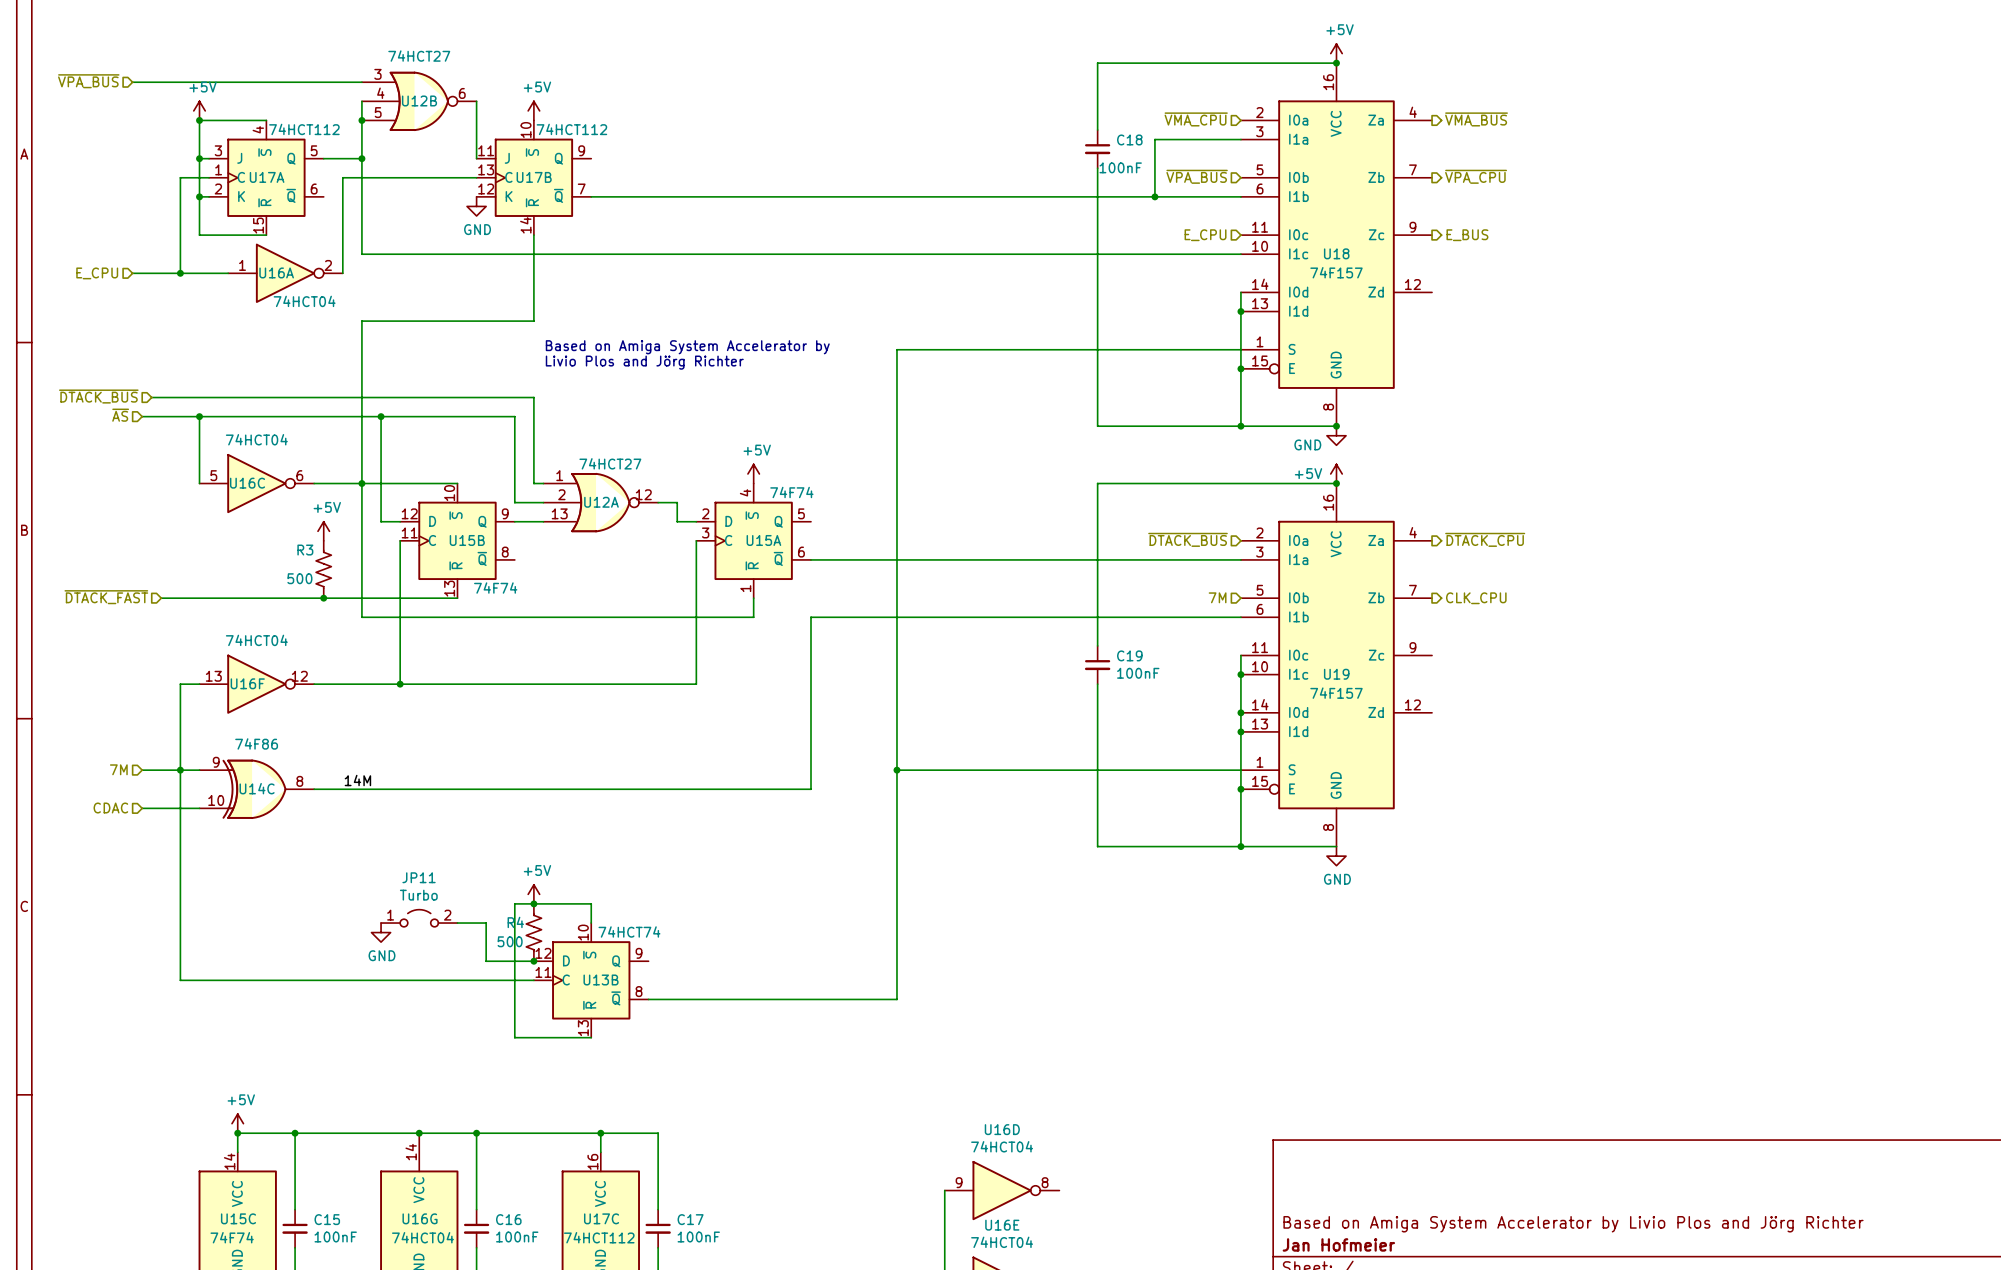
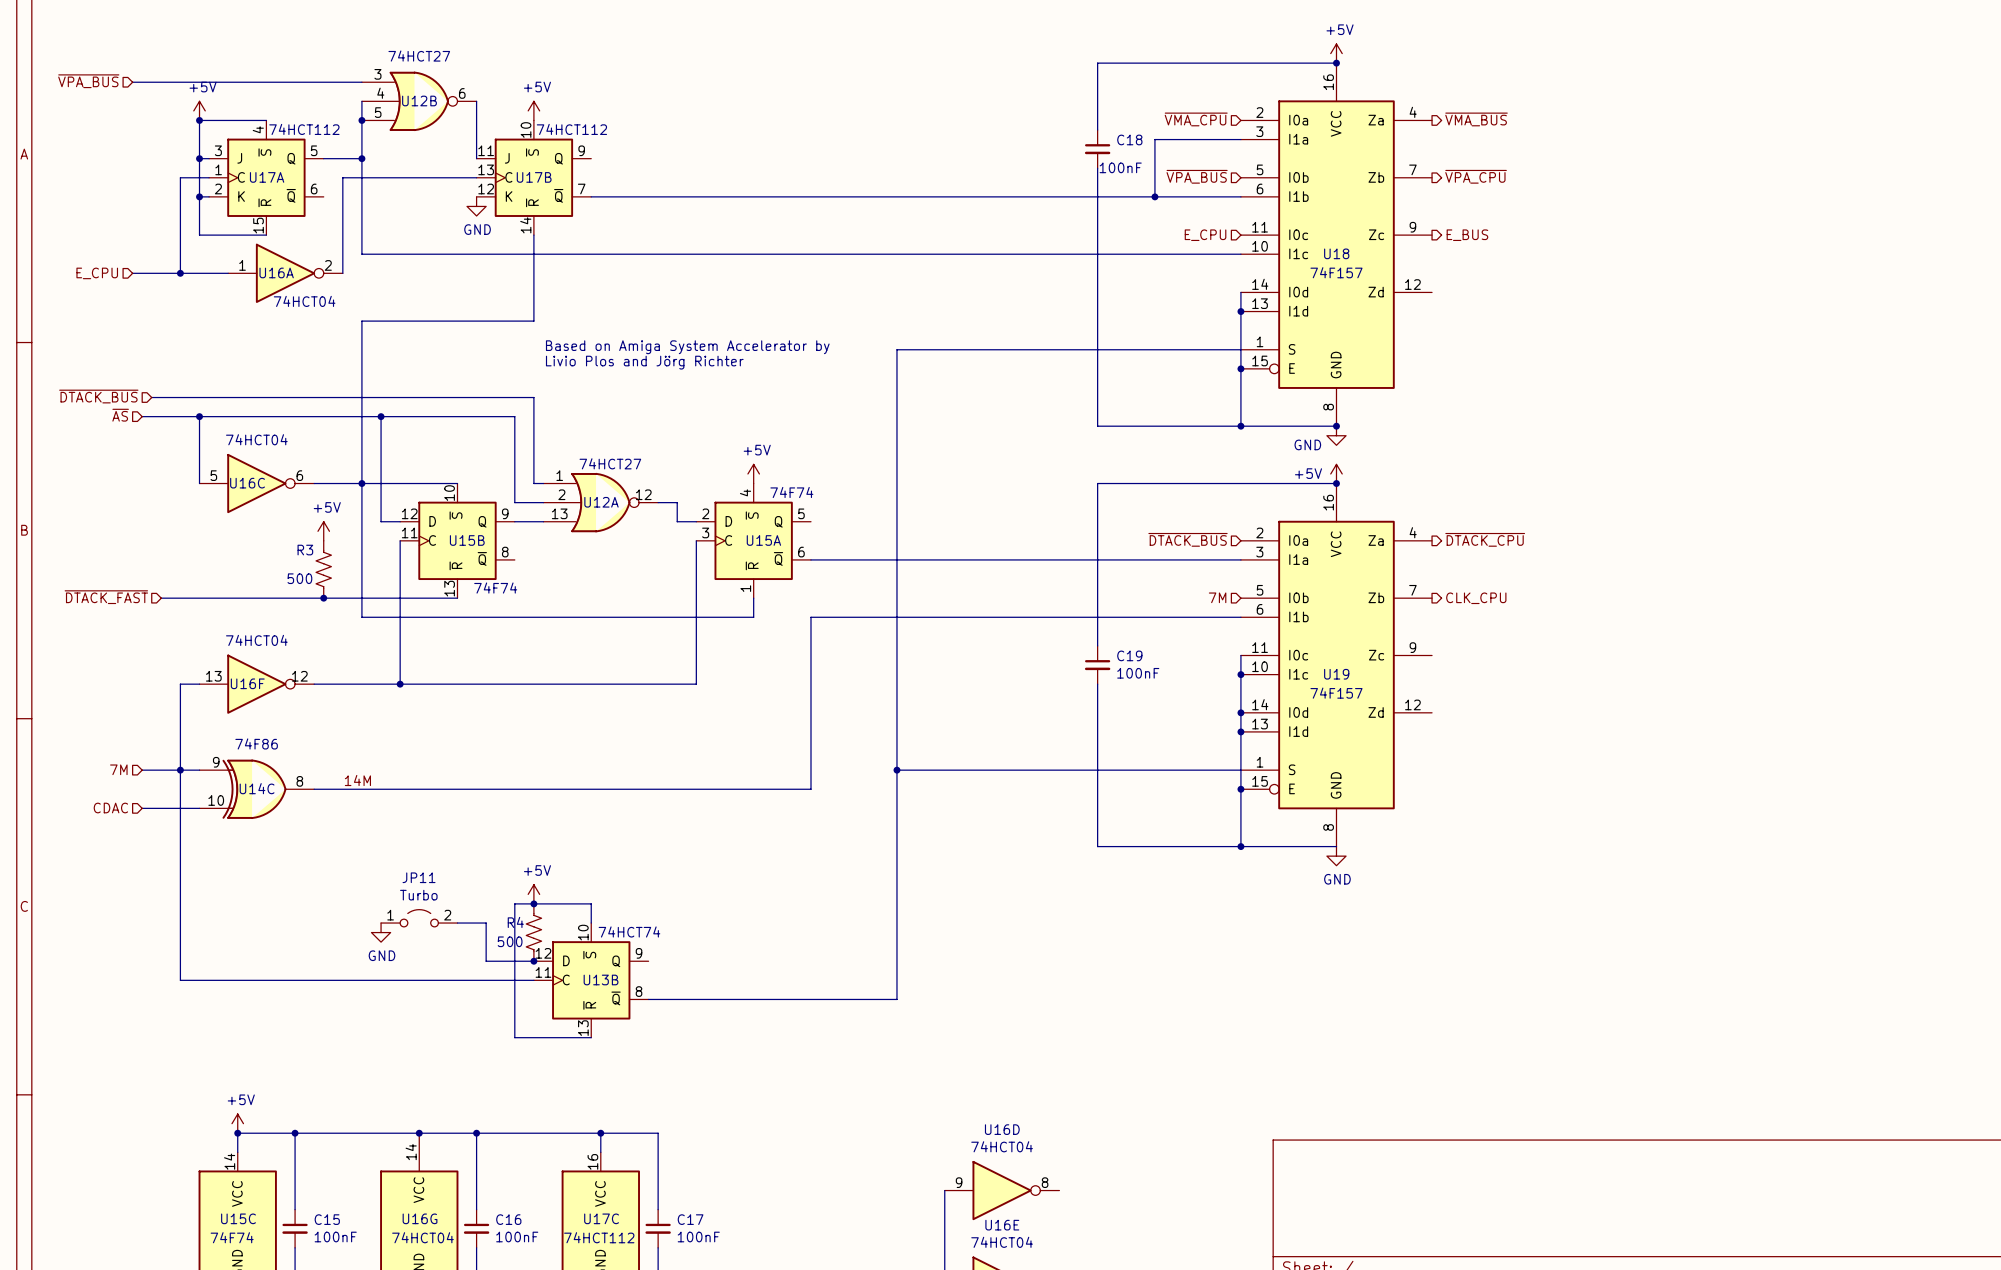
title block: Based on Amiga System Accelerator by Livio Plos and Jörg Richter (1573, 1224) -> none
title block: Jan Hofmeier (1338, 1244) -> none

